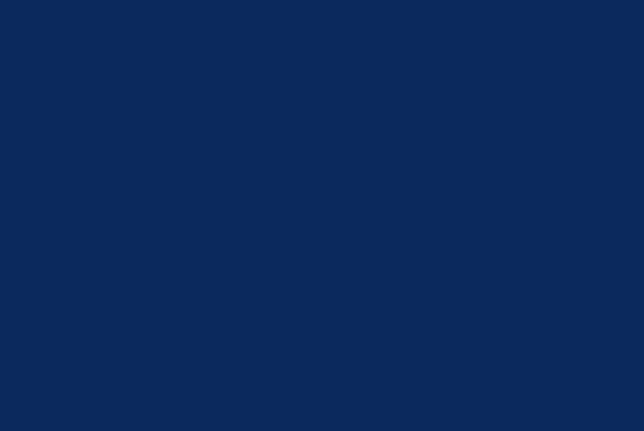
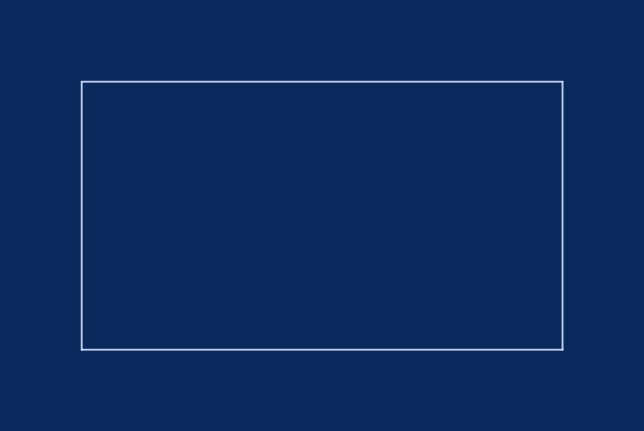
board edge: none -> (562, 81) (81, 81) (81, 349) (562, 349) (562, 81)

